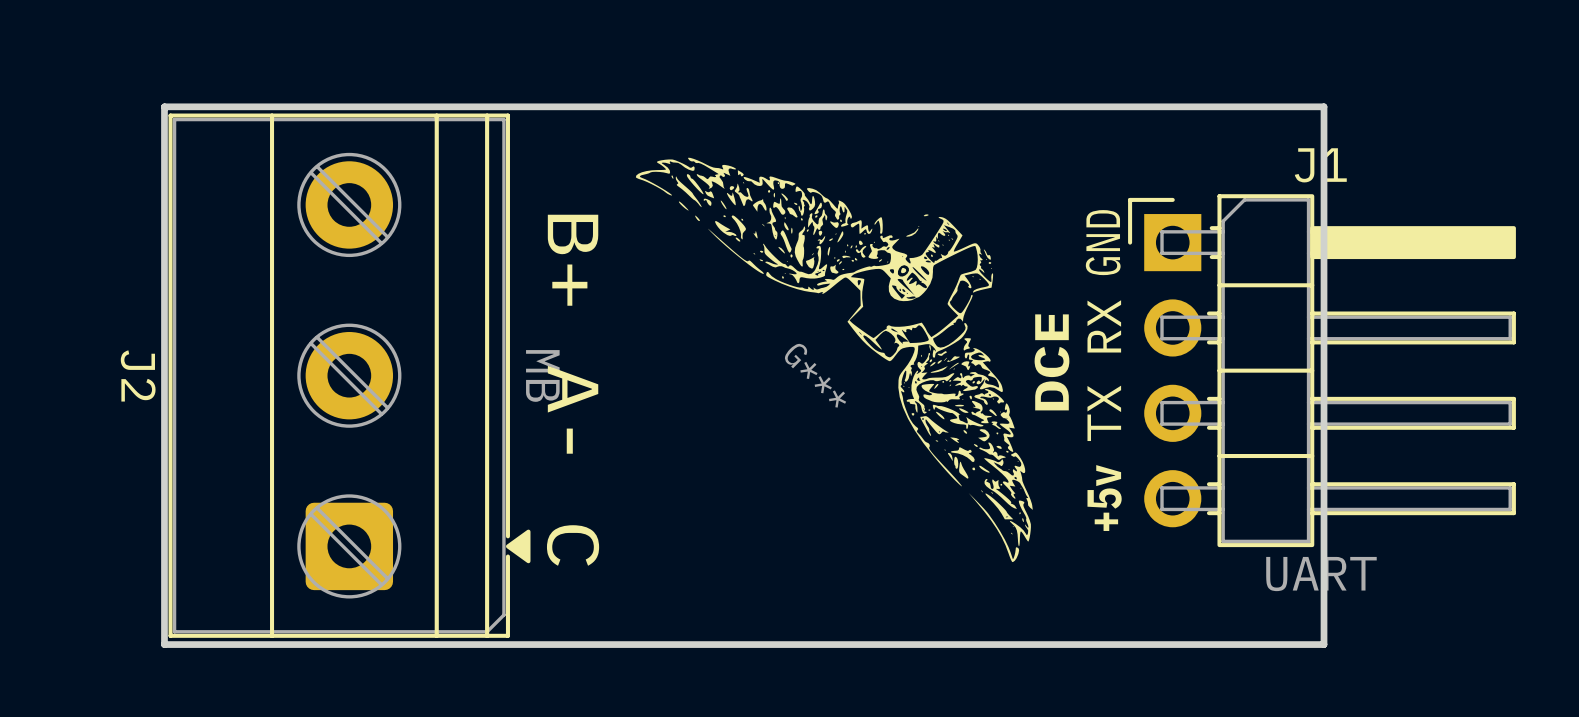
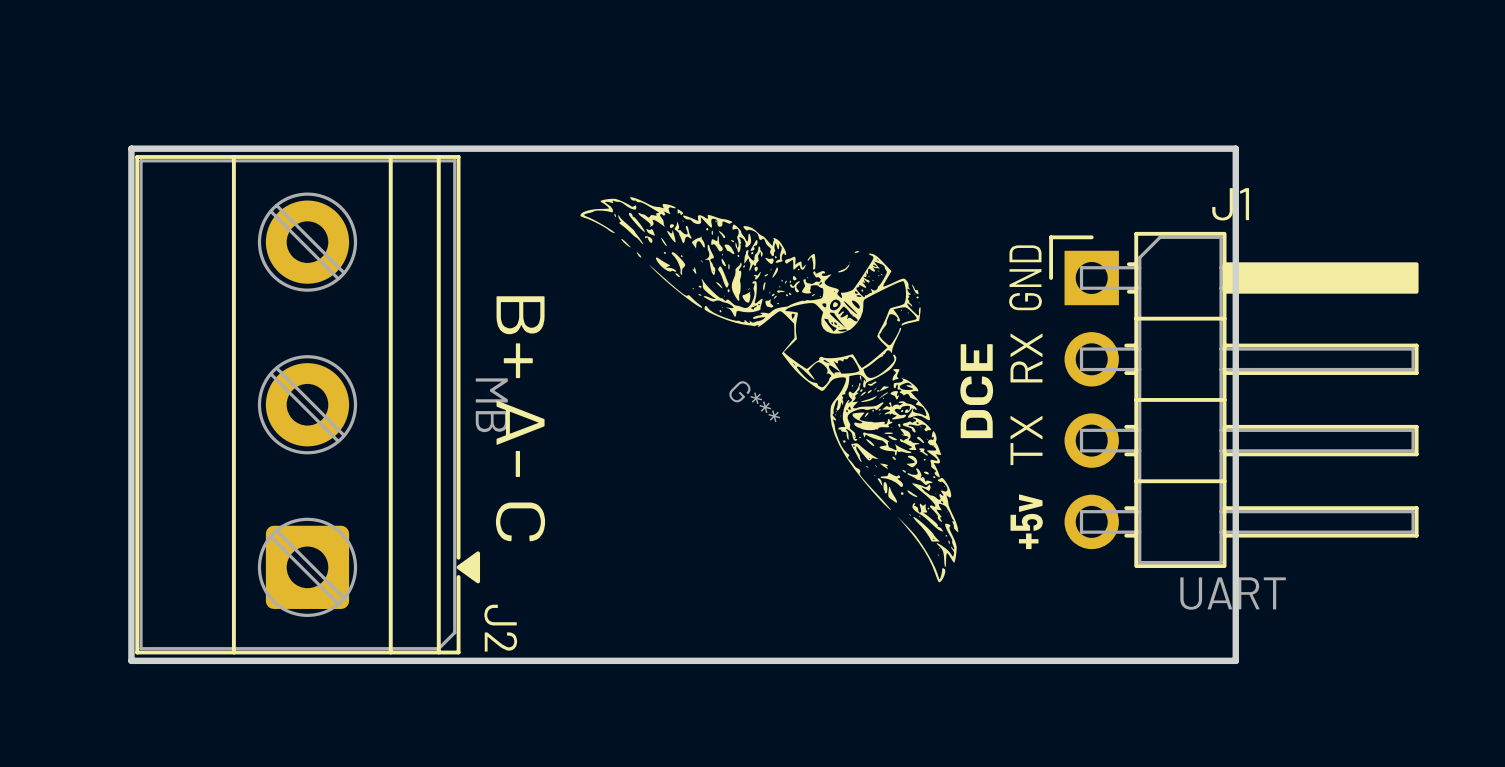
J2 name position: J2 (138, 375) -> J2 (500, 628)

